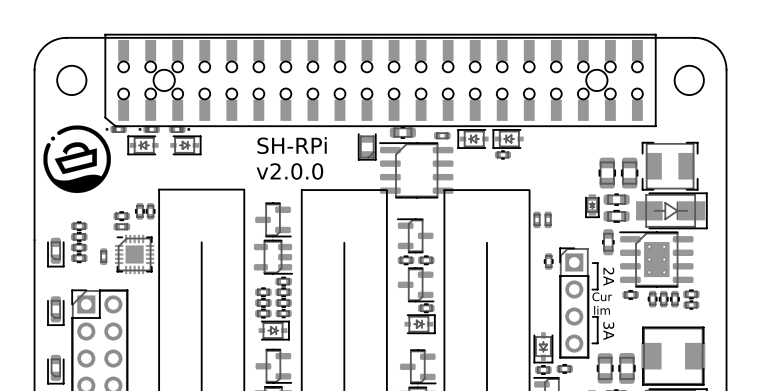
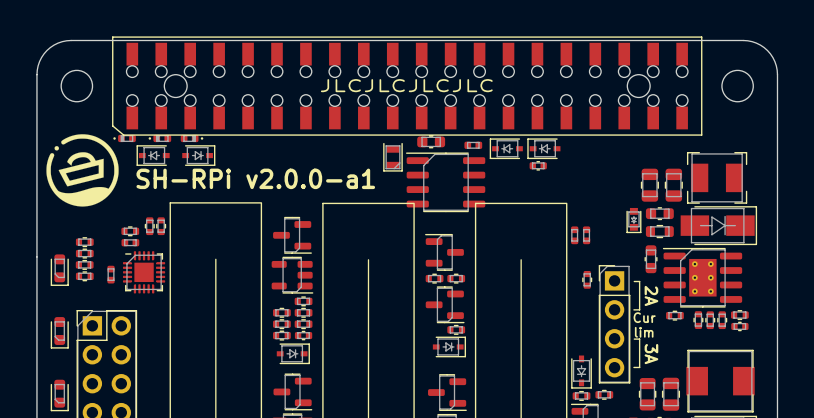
text: none -> JLCJLCJLCJLC (406, 85)
text: SH-RPi (292, 145) -> none
text: none -> SH-RPi v2.0.0-a1 (255, 178)
text: v2.0.0 (289, 171) -> none

